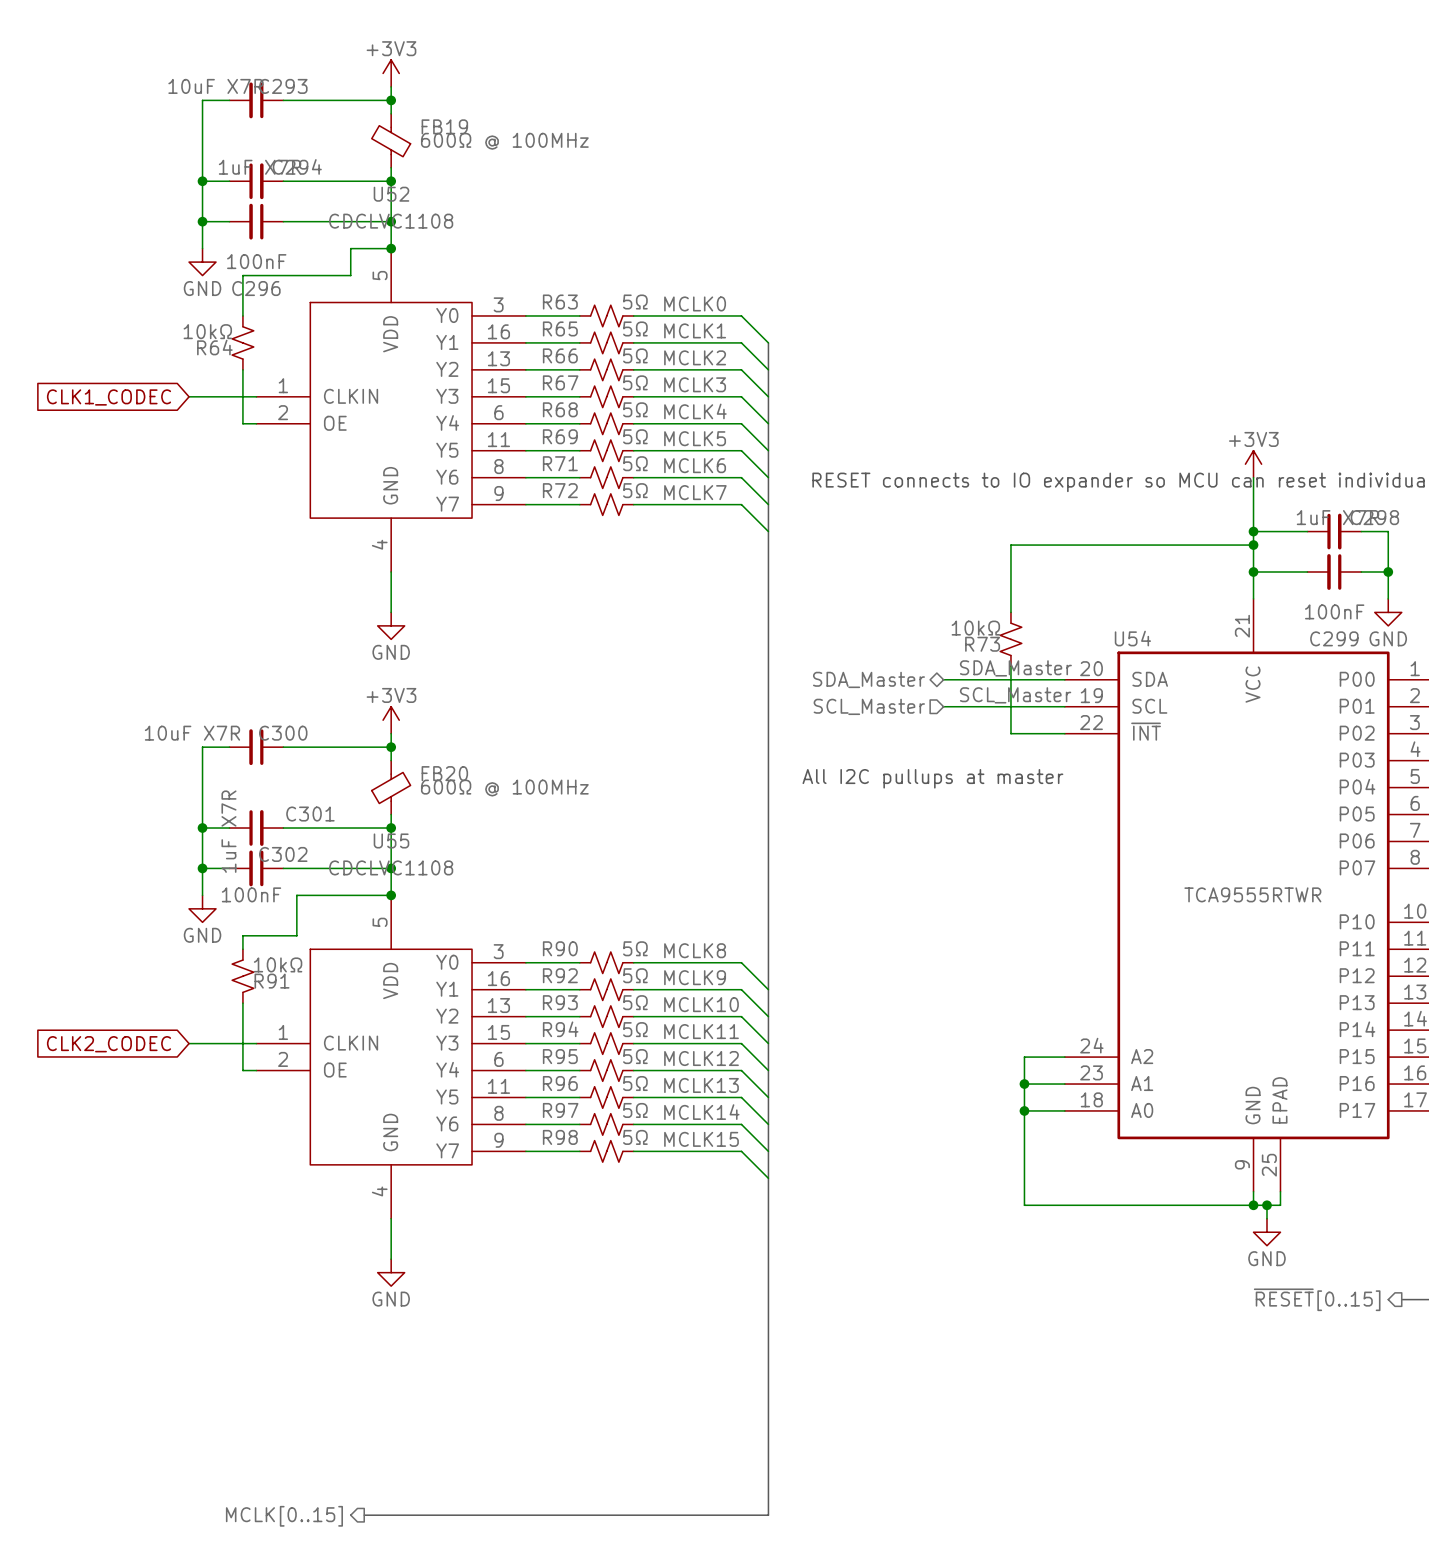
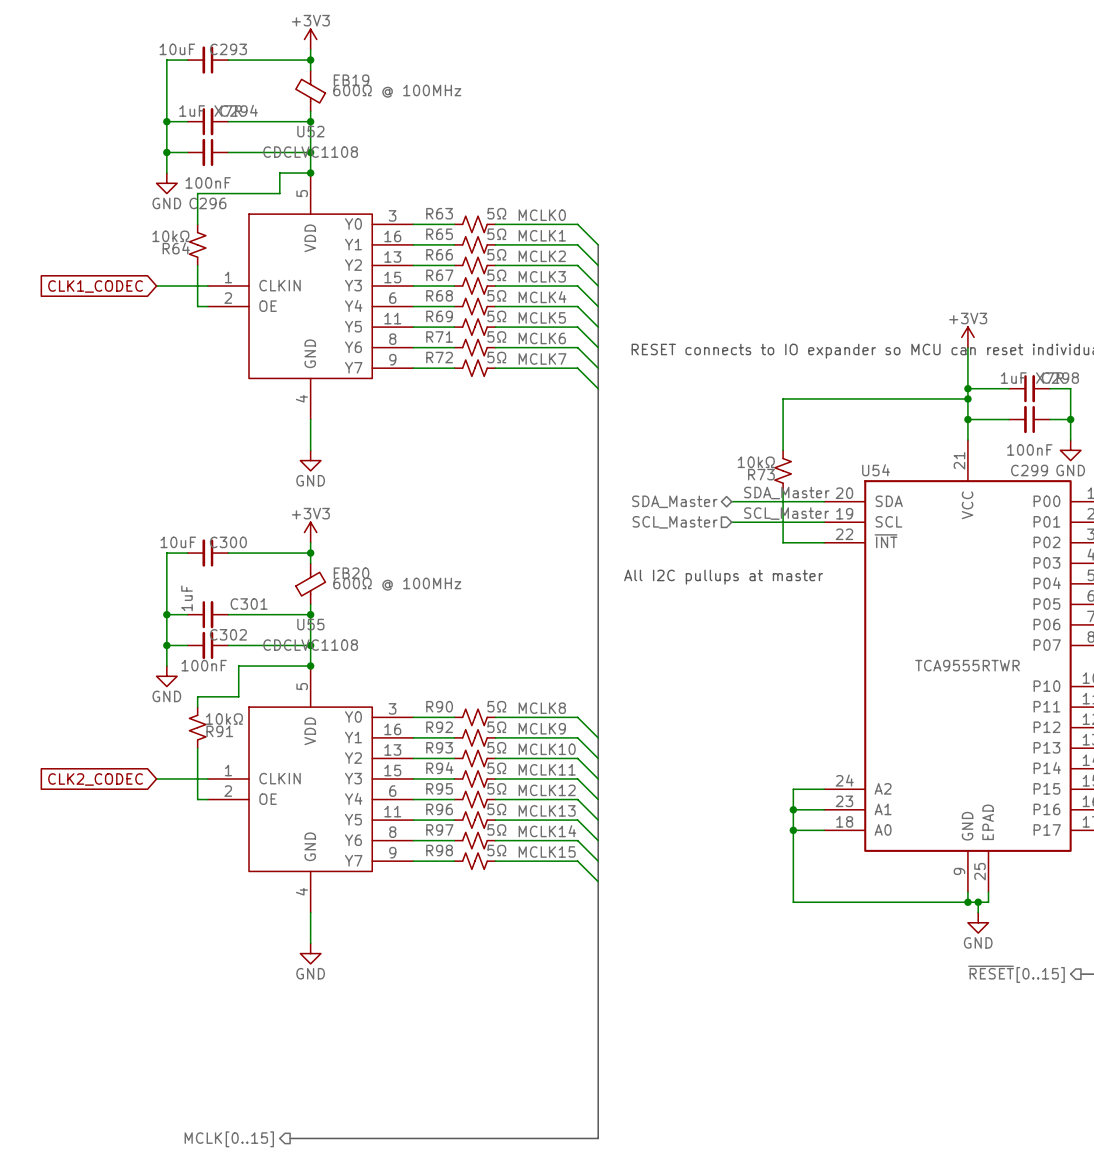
C293 value: 10uF X7R (216, 86) -> 10uF (177, 49)
C300 value: 10uF X7R (192, 733) -> 10uF (178, 542)
C301 value: 1uF X7R (228, 831) -> 1uF (186, 598)

